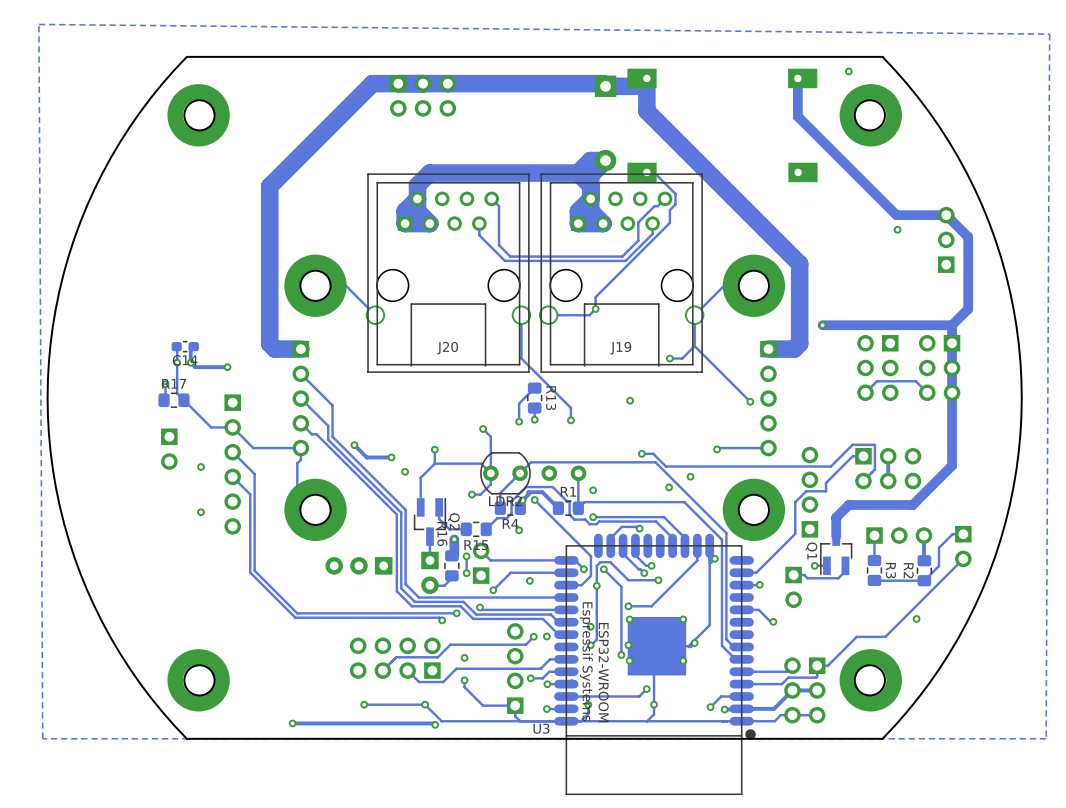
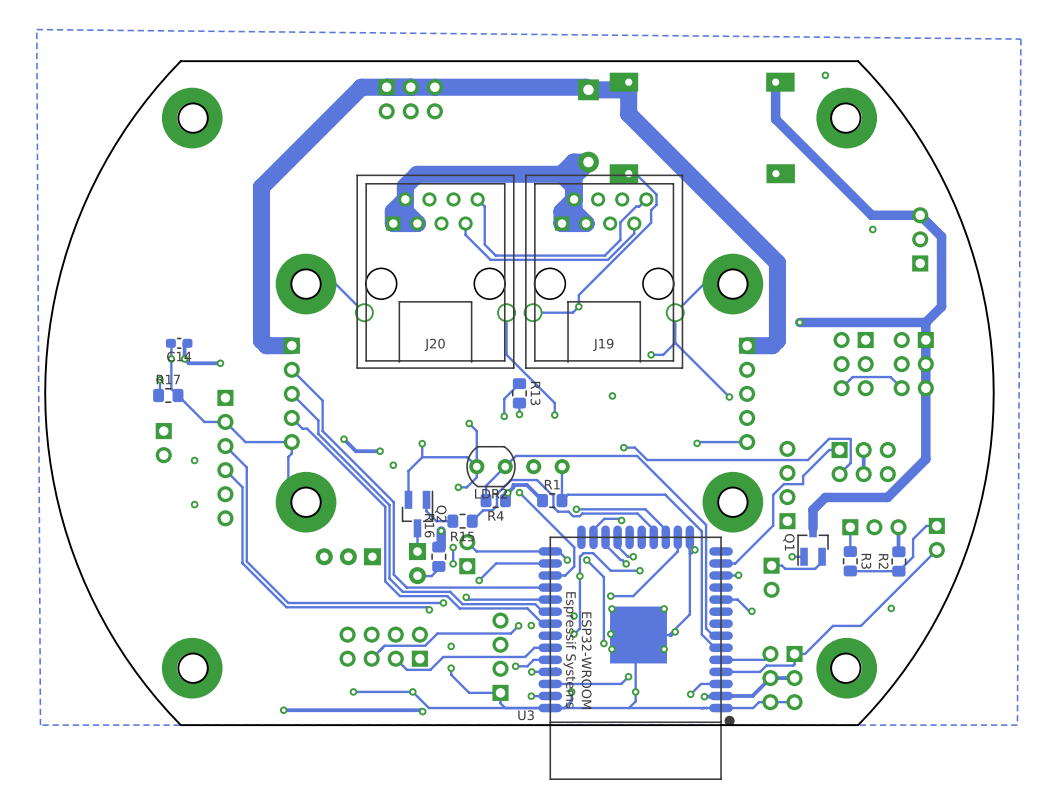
via: (690, 476) -> none
via: (669, 487) -> none
via: (593, 490) -> none
via: (519, 530) -> none
via: (529, 580) -> none

